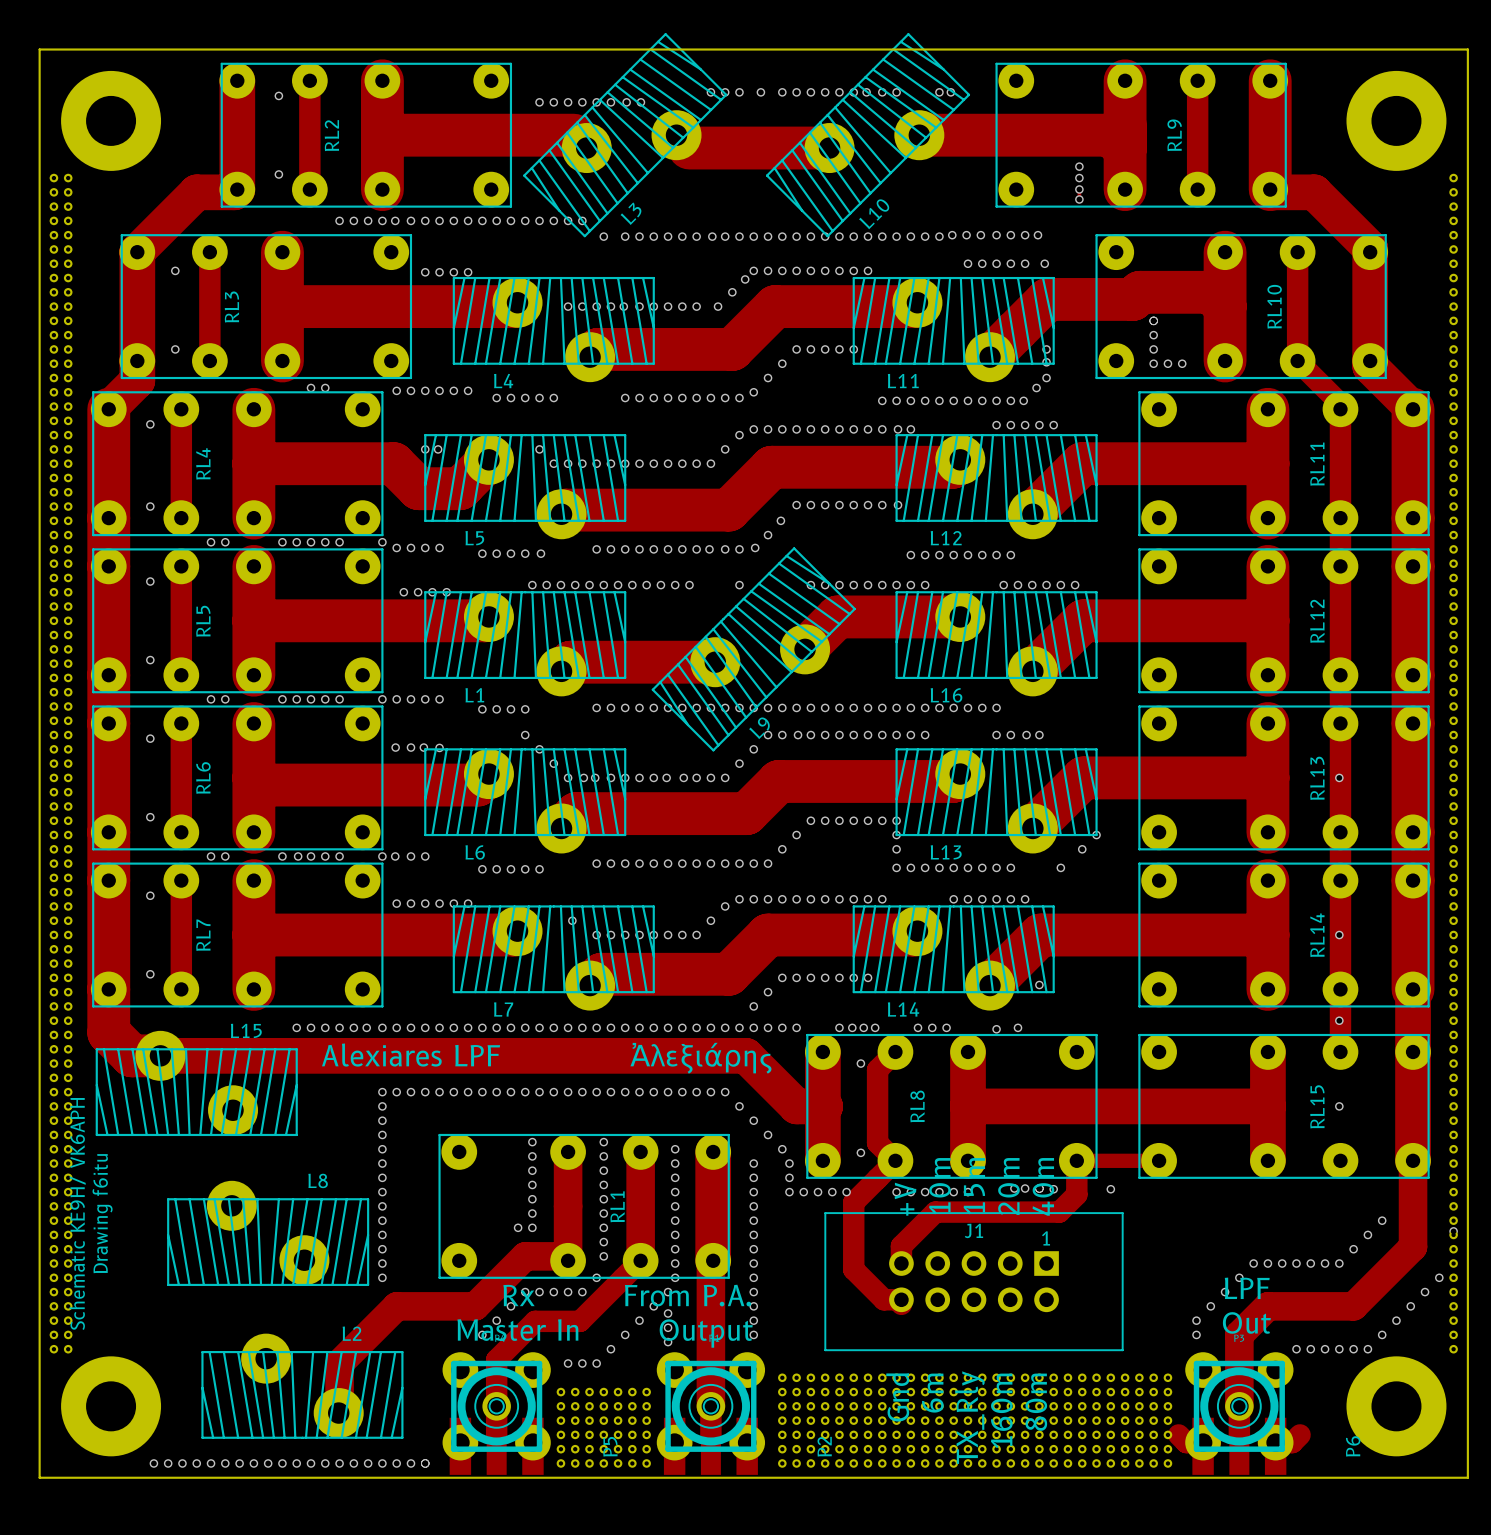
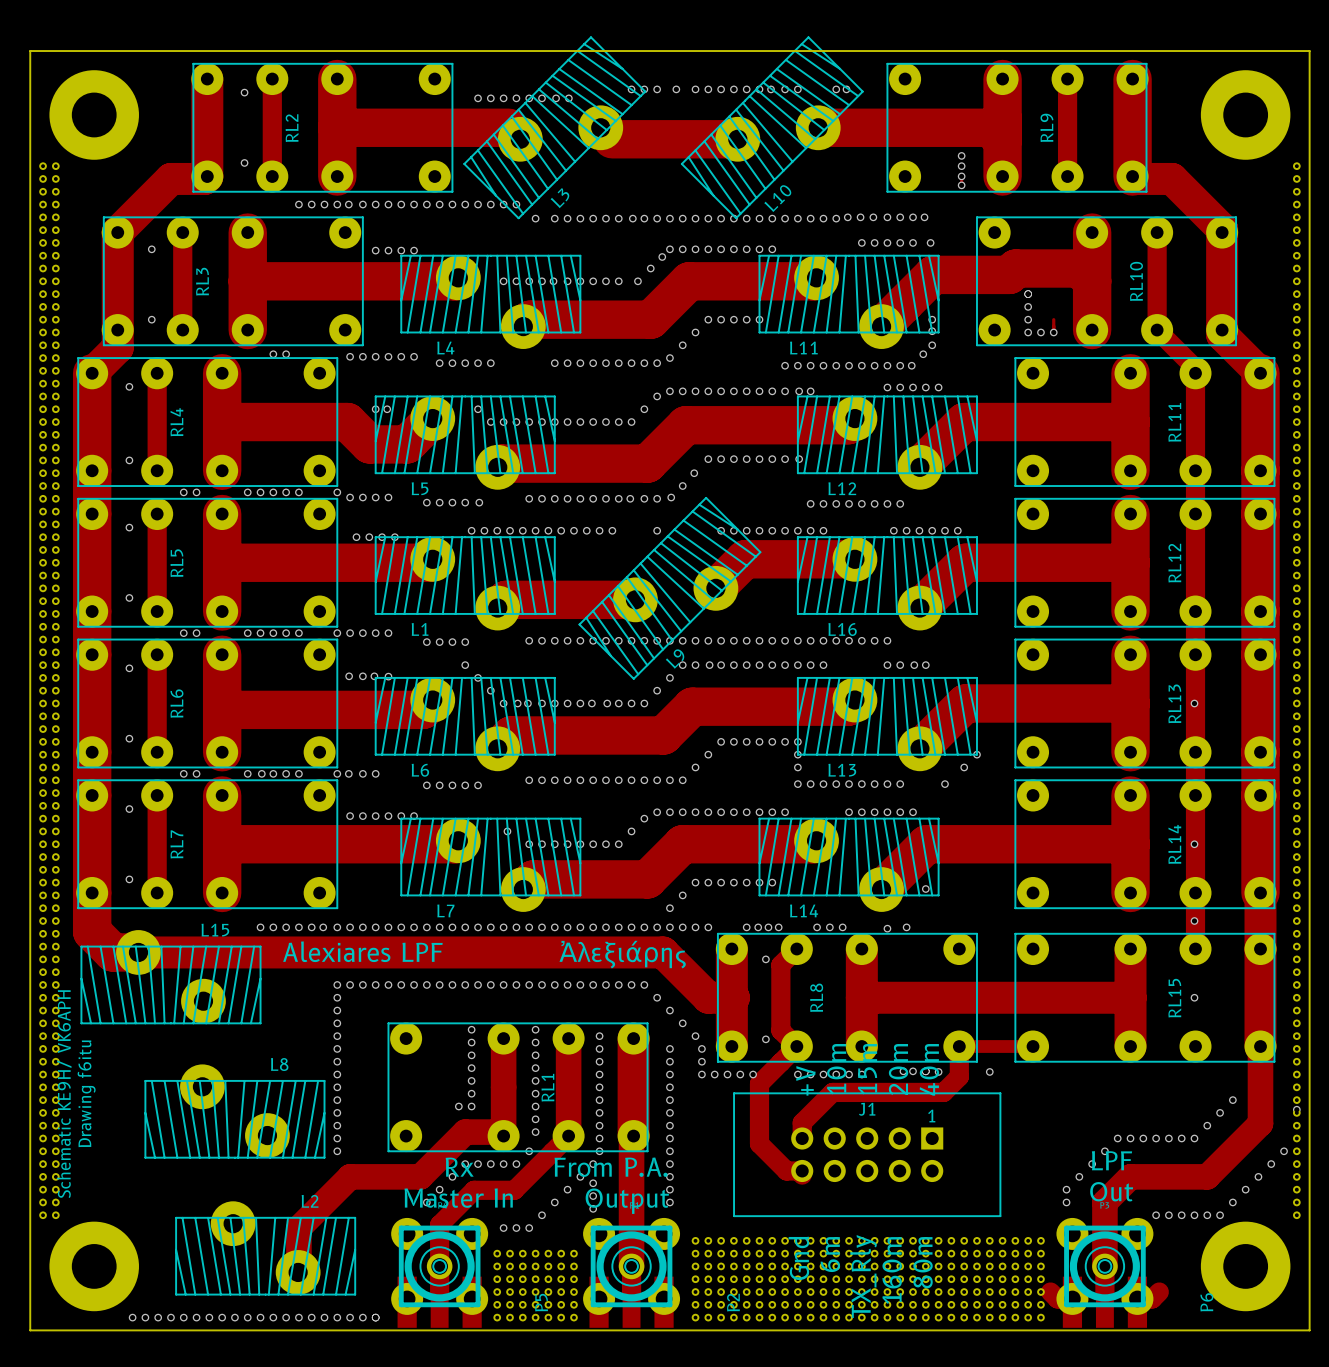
track: none -> (1053, 319) (1053, 332)

